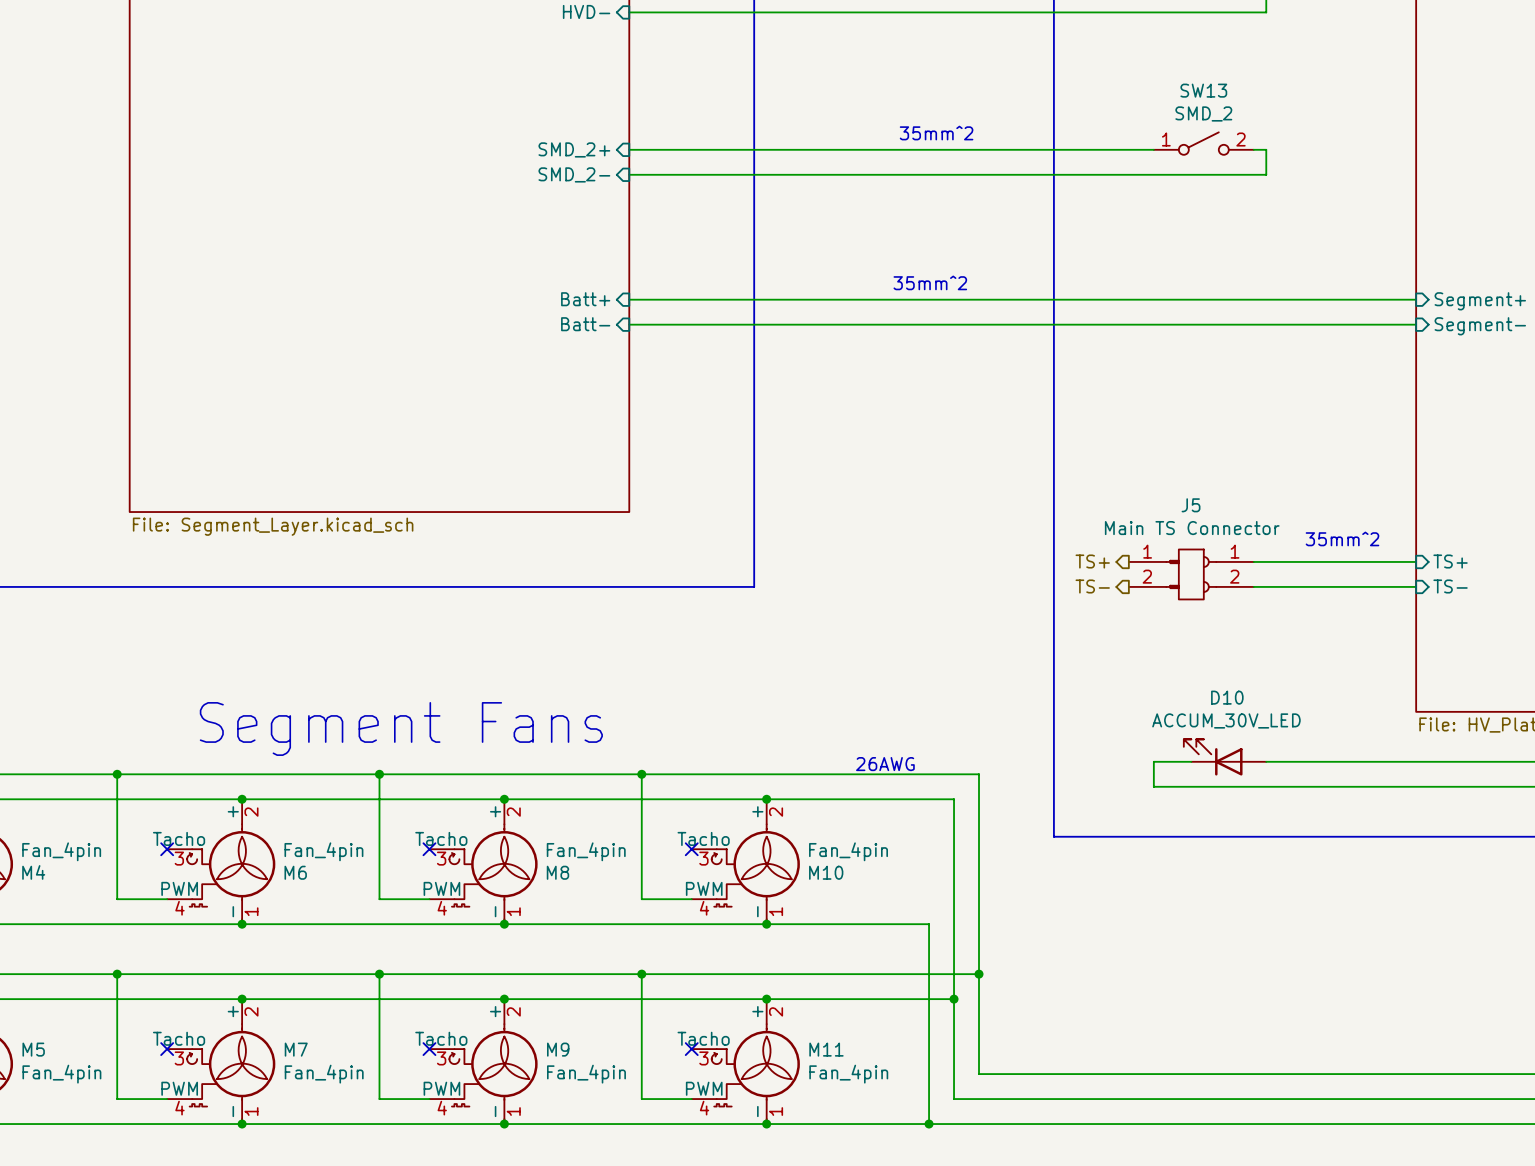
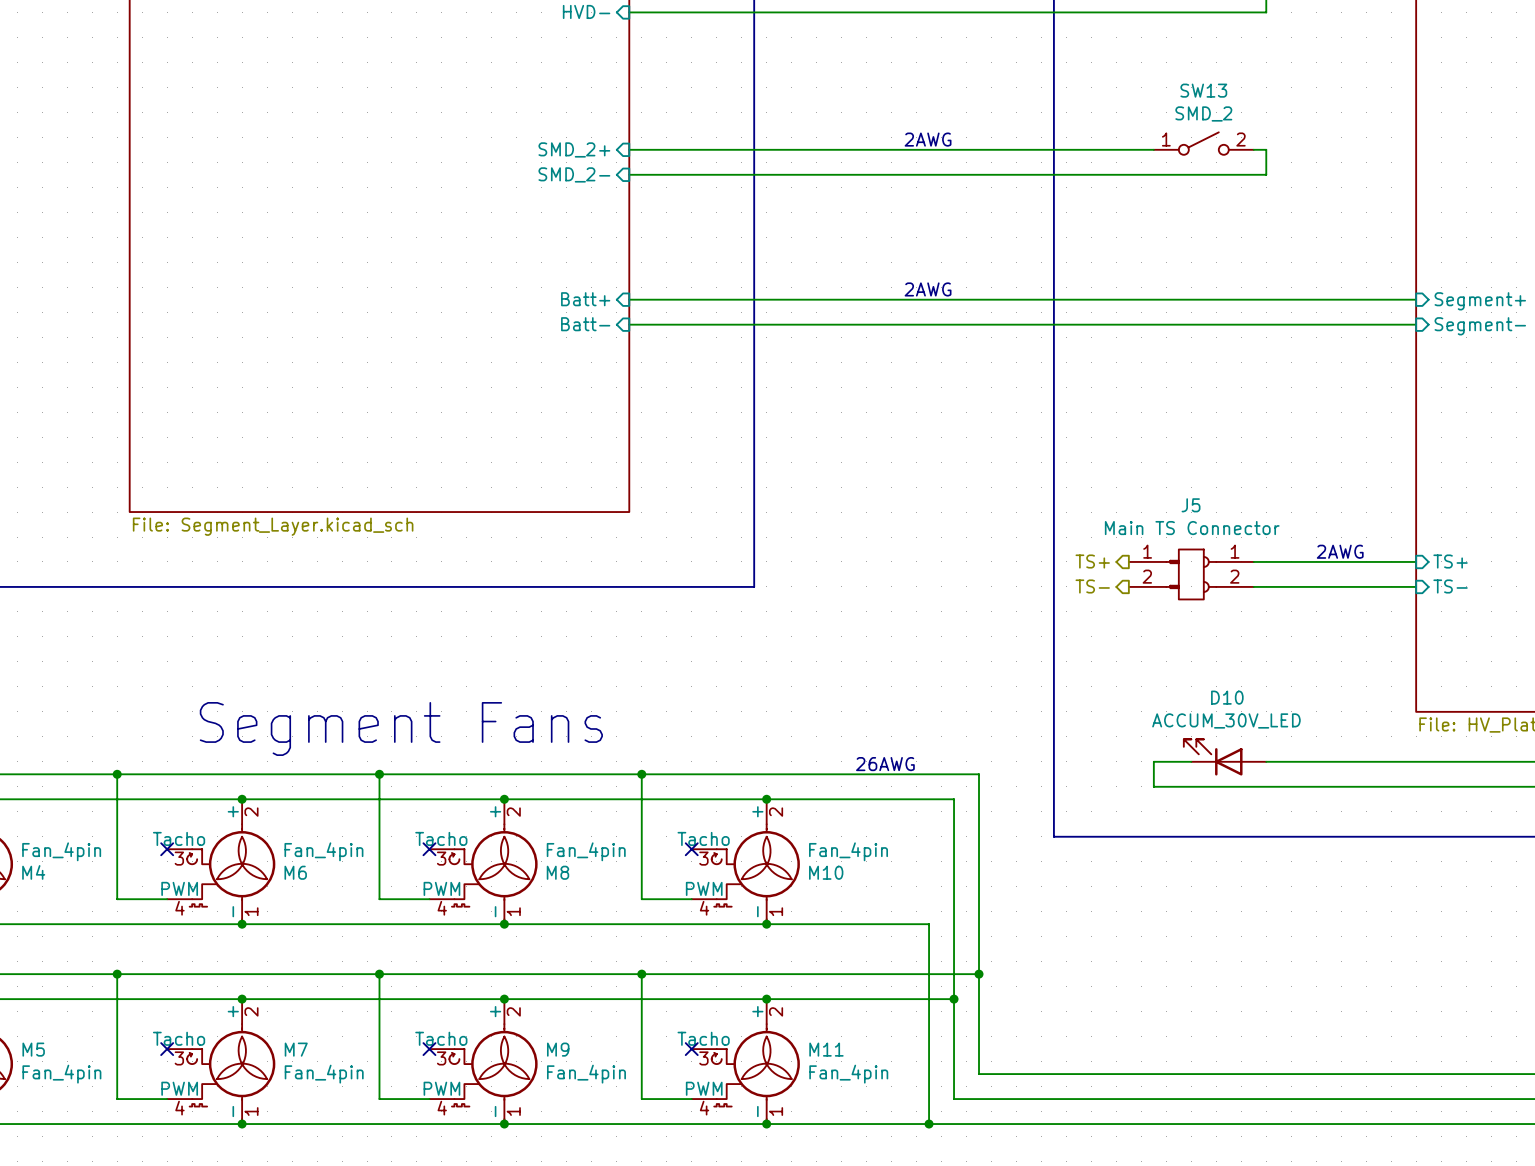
text: 35mm^2 (936, 133) -> none
text: none -> 2AWG (928, 139)
text: 35mm^2 (930, 282) -> none
text: none -> 2AWG (928, 289)
text: 35mm^2 (1342, 538) -> none
text: none -> 2AWG (1340, 551)

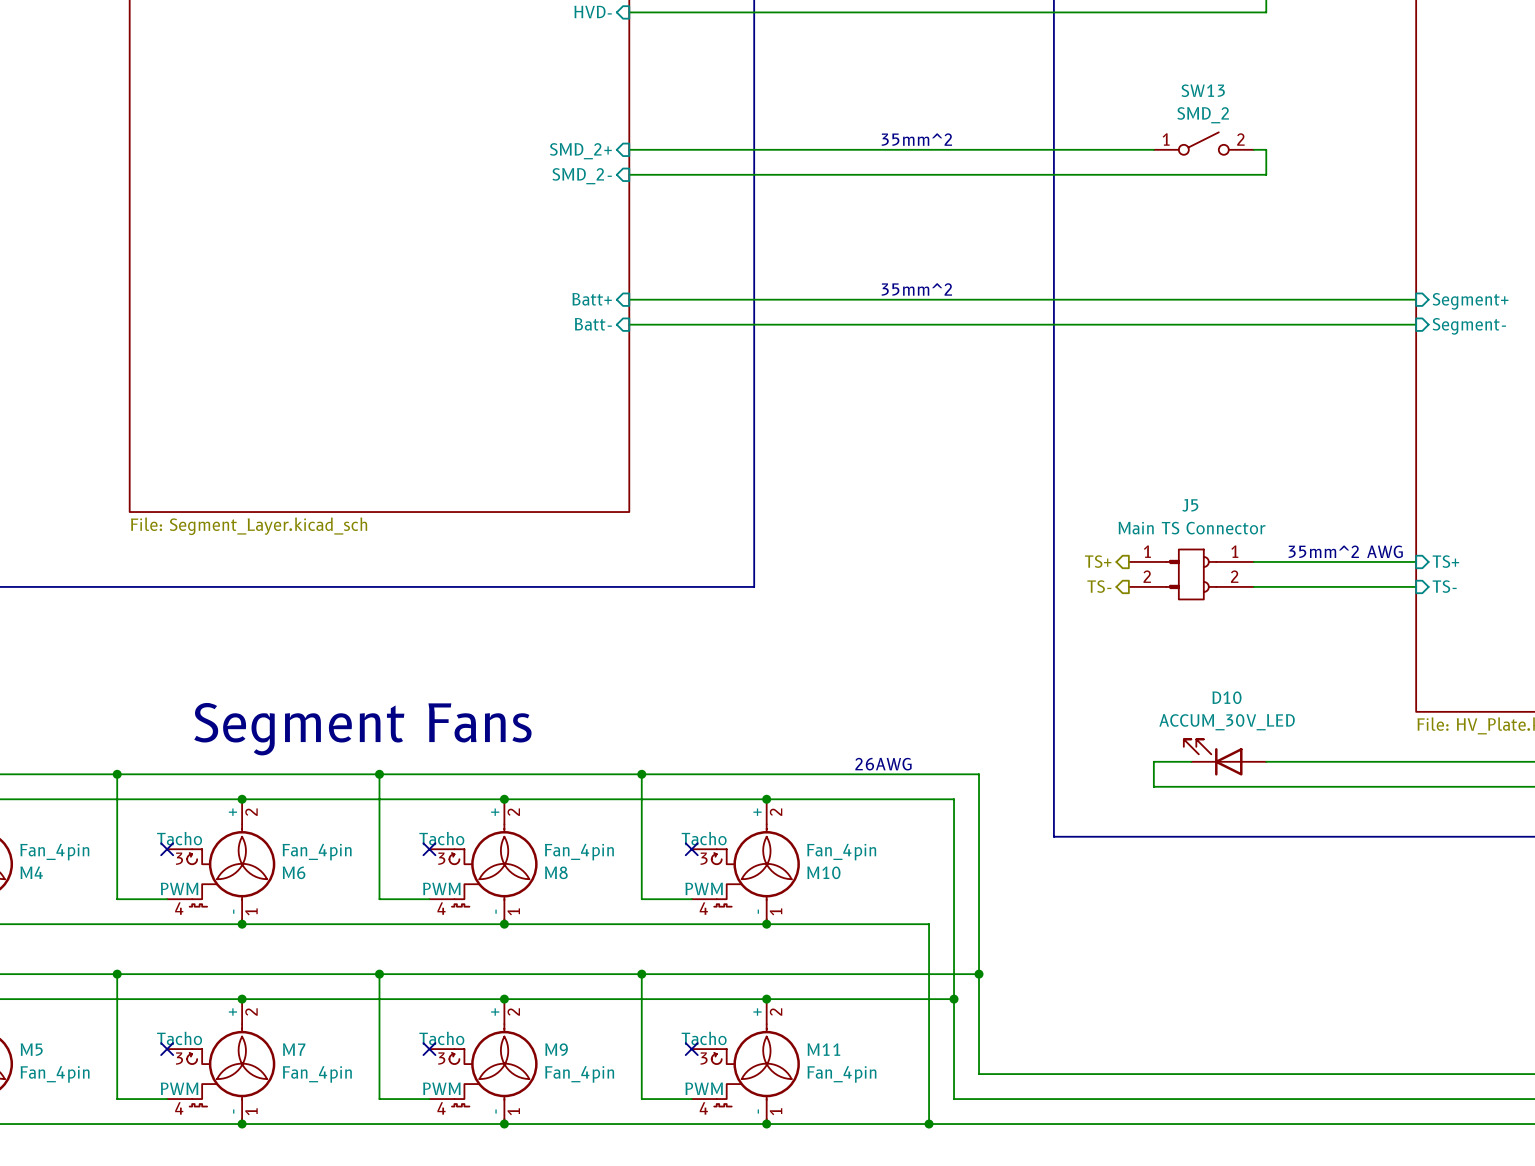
text: 2AWG (928, 139) -> 35mm^2 (916, 139)
text: 2AWG (928, 289) -> 35mm^2 (916, 289)
text: 2AWG (1340, 551) -> none
text: none -> 35mm^2 AWG (1345, 551)

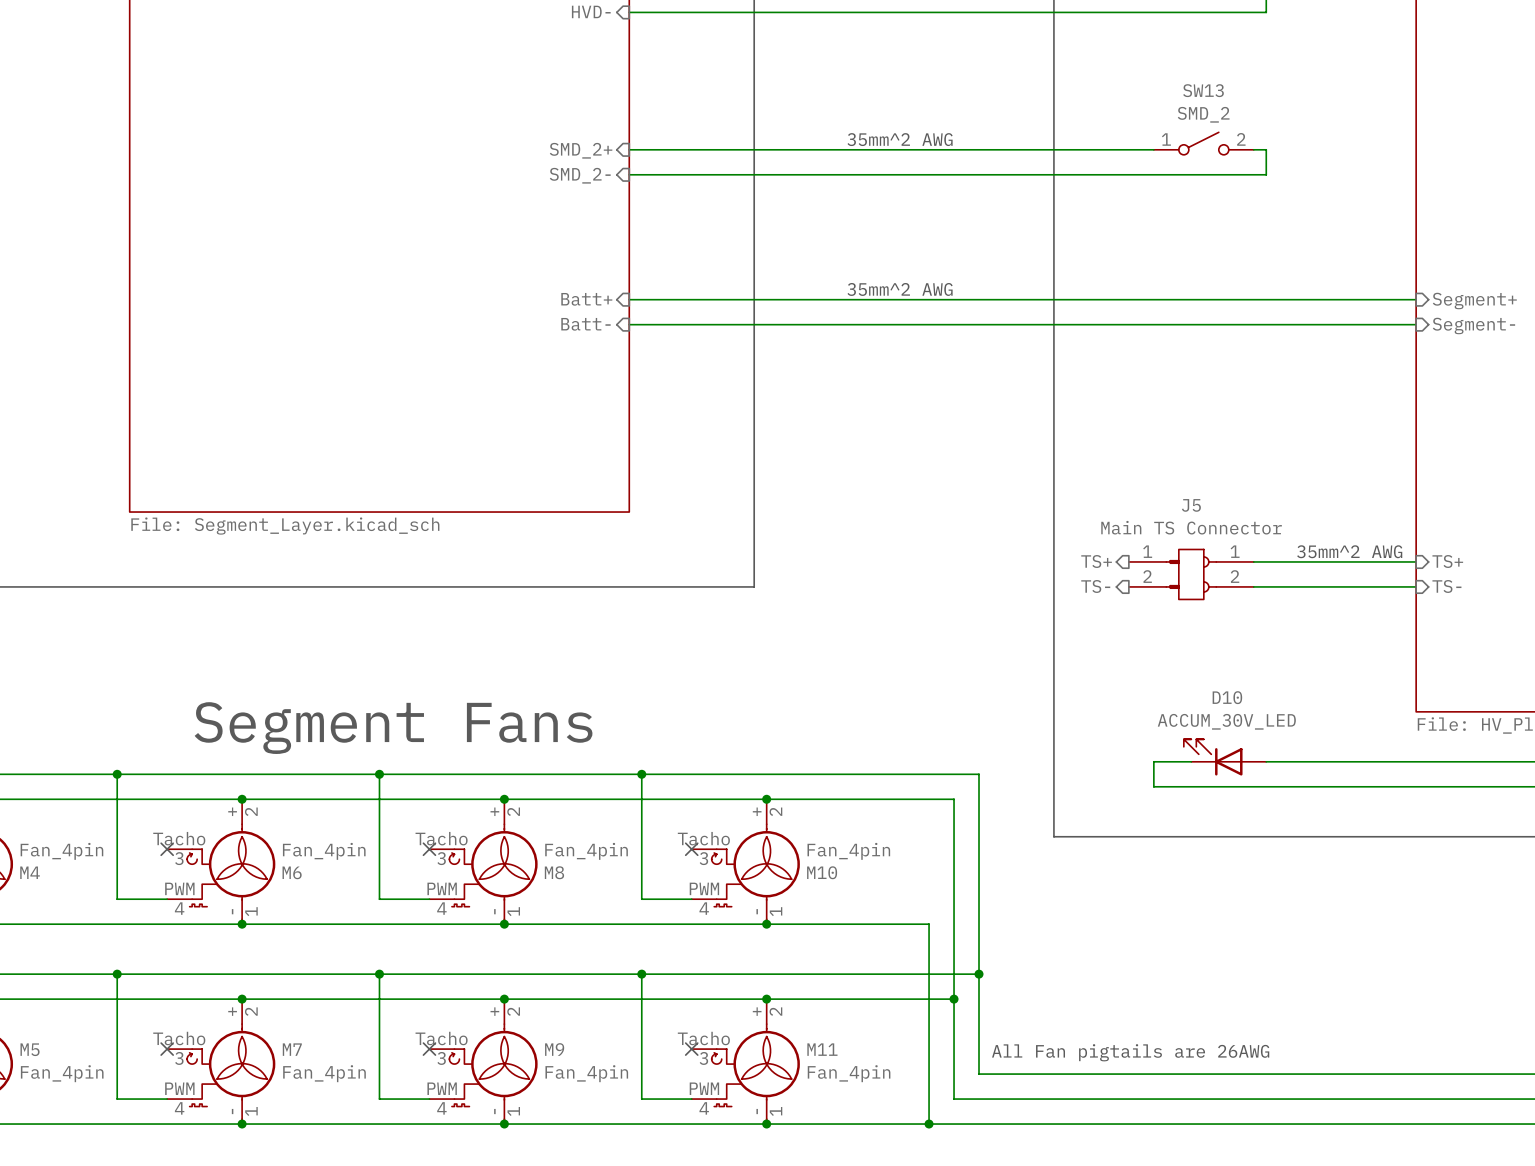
text: 35mm^2 (916, 139) -> 35mm^2 AWG (900, 139)
text: 35mm^2 (916, 289) -> 35mm^2 AWG (900, 289)
text: 26AWG (883, 764) -> none
text: none -> All Fan pigtails are 26AWG (1130, 1052)

